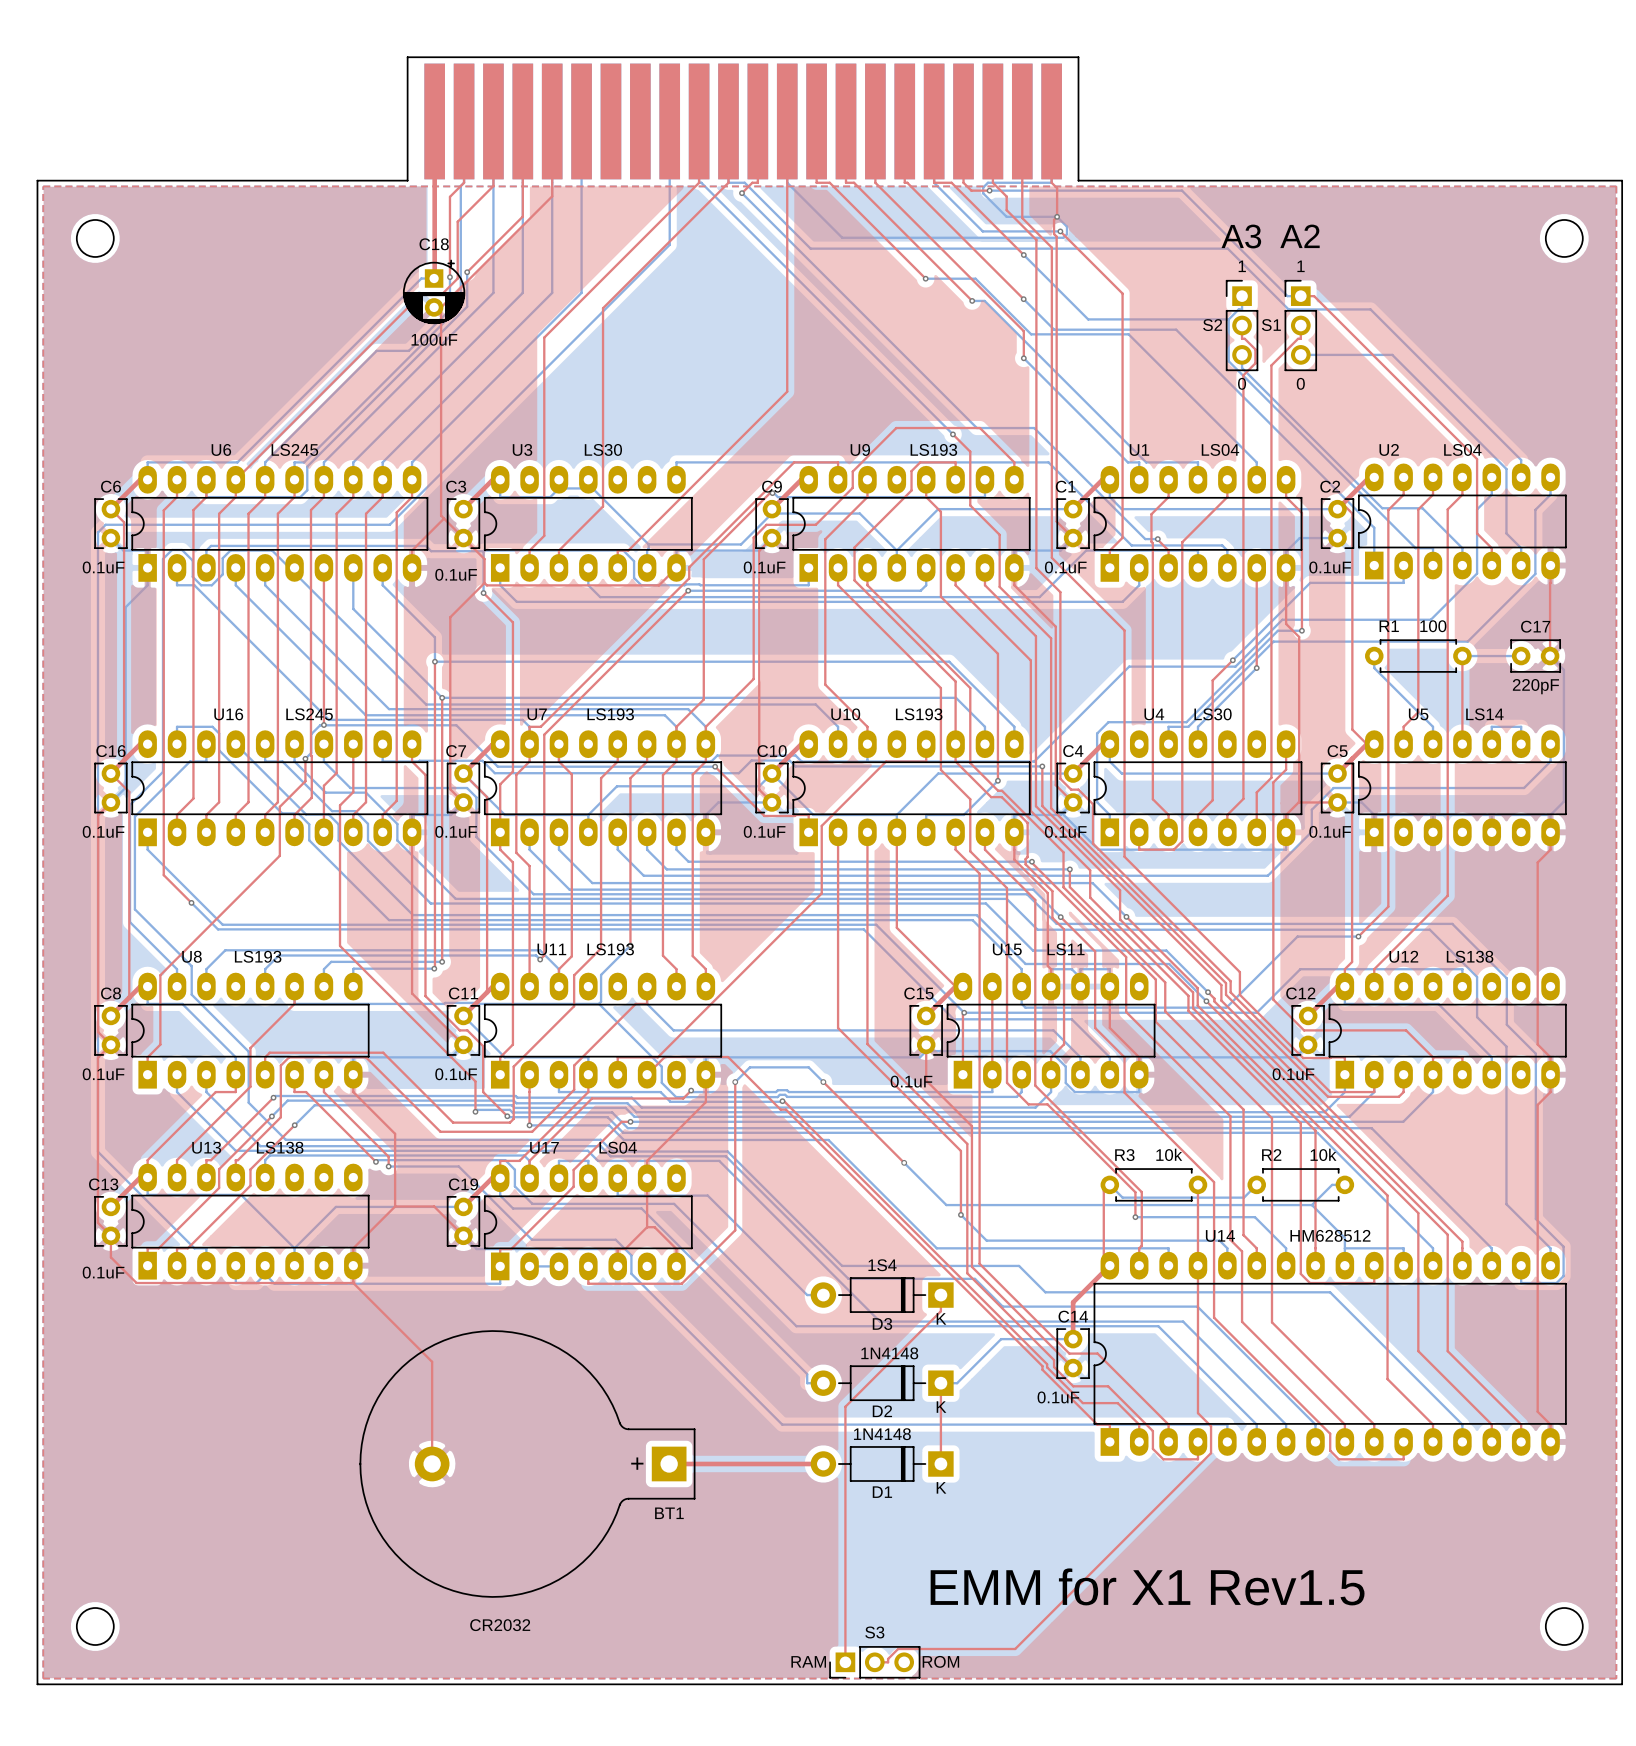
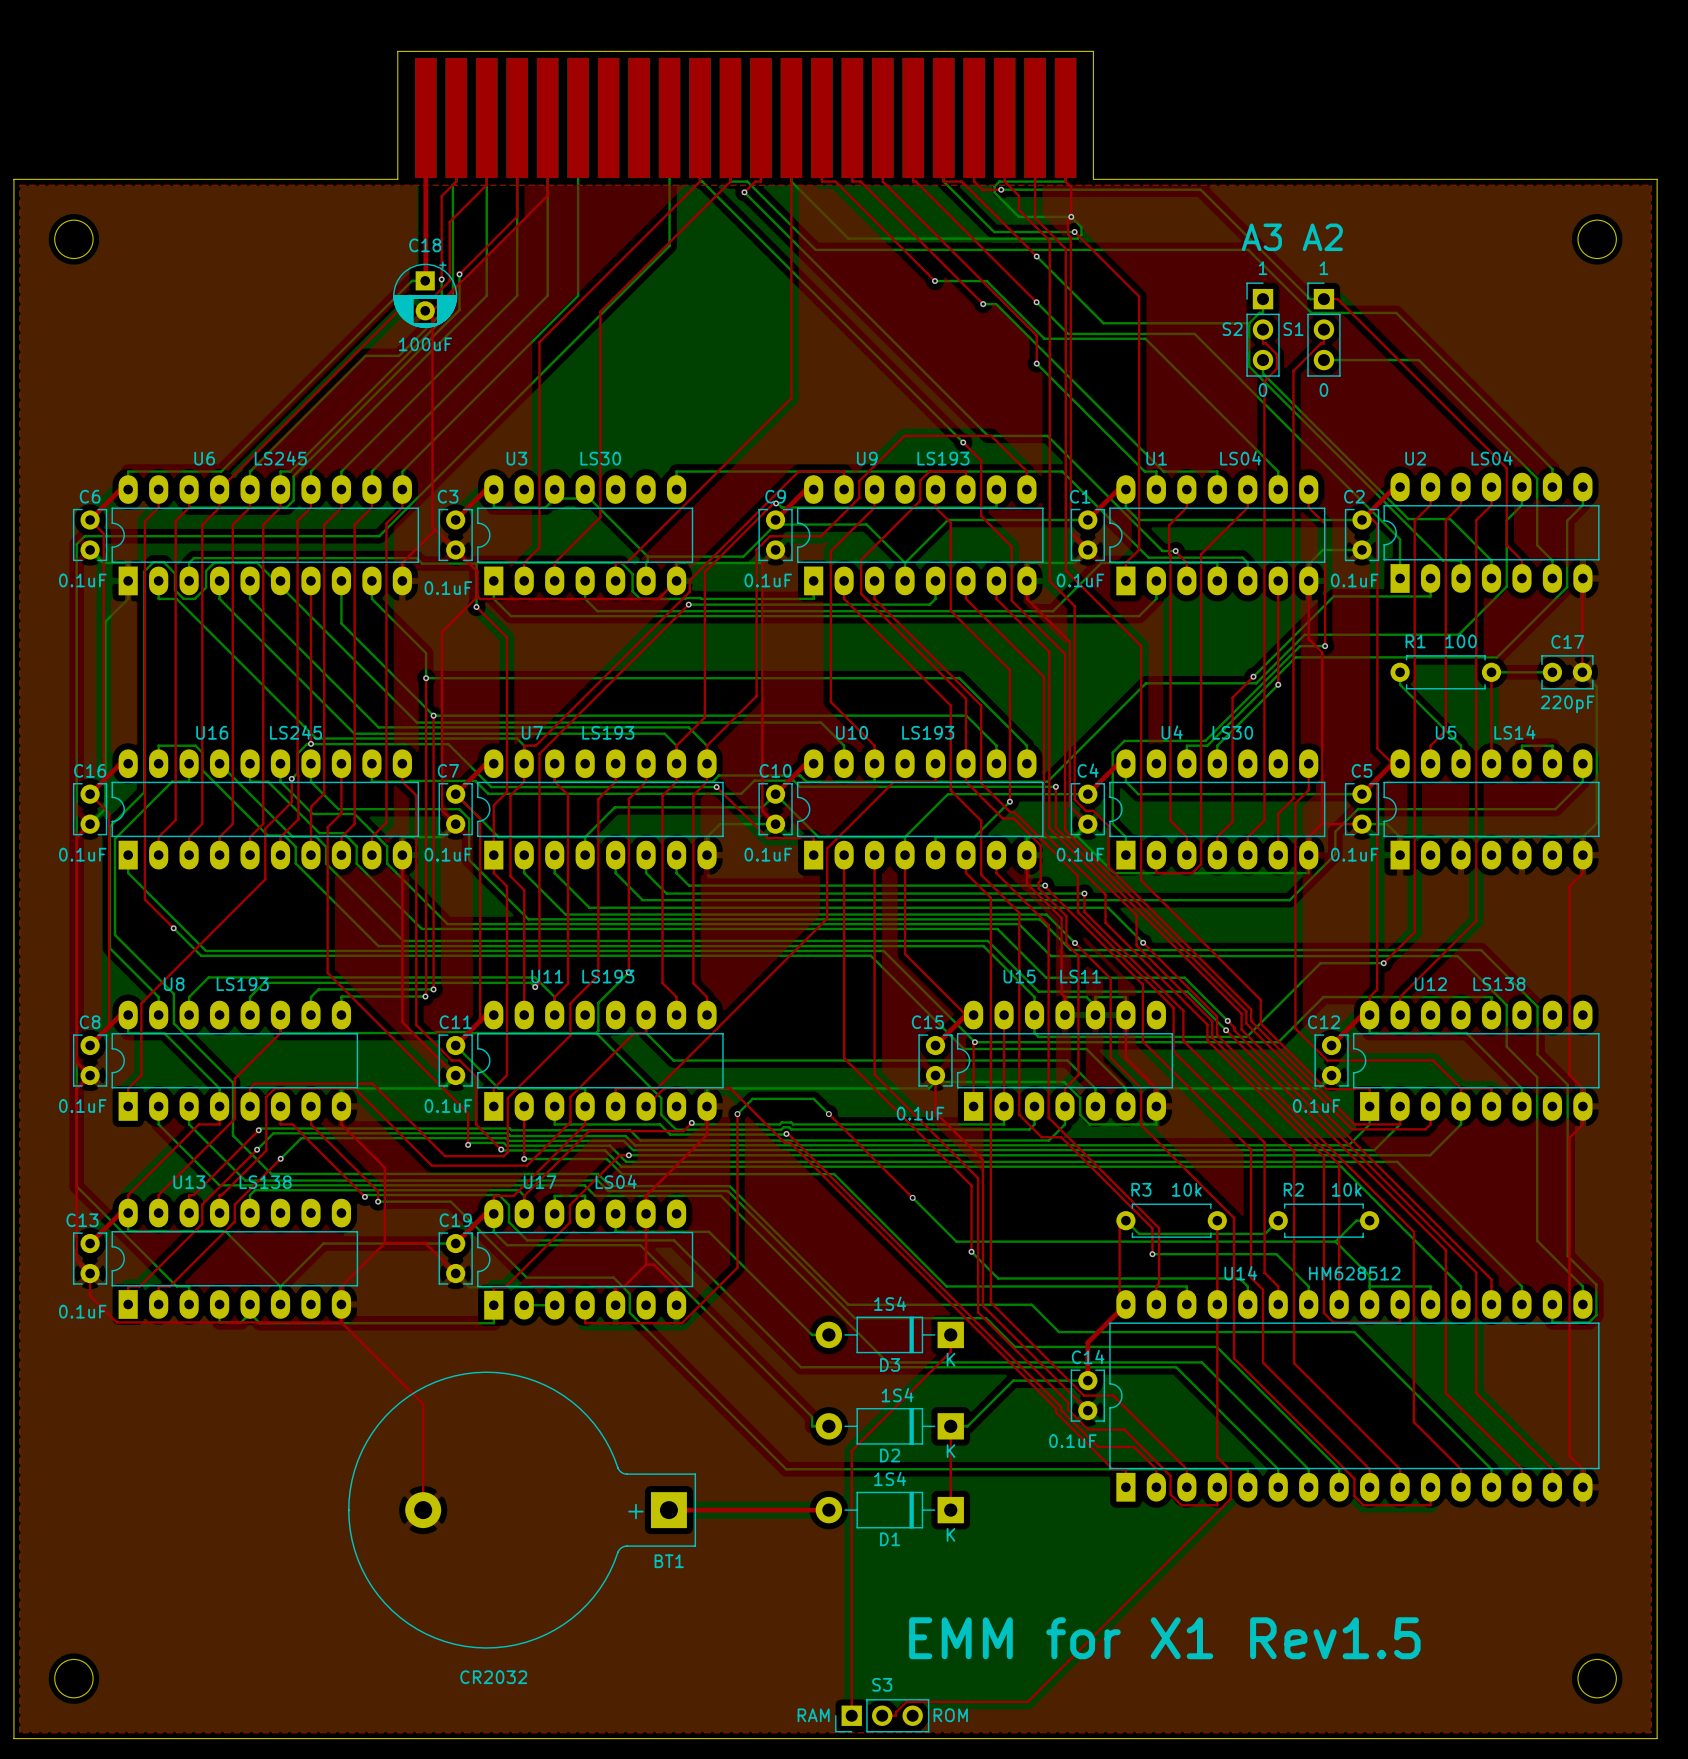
text: 1N4148 (889, 1353) -> 1S4 (897, 1395)
text: 1N4148 (882, 1434) -> 1S4 (890, 1478)

